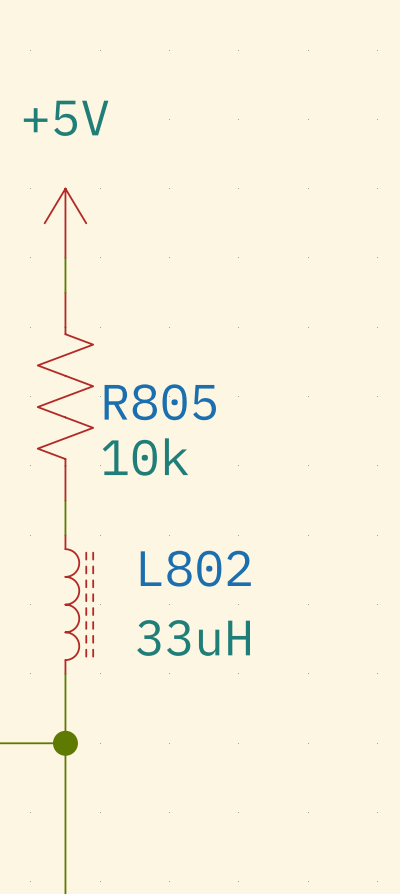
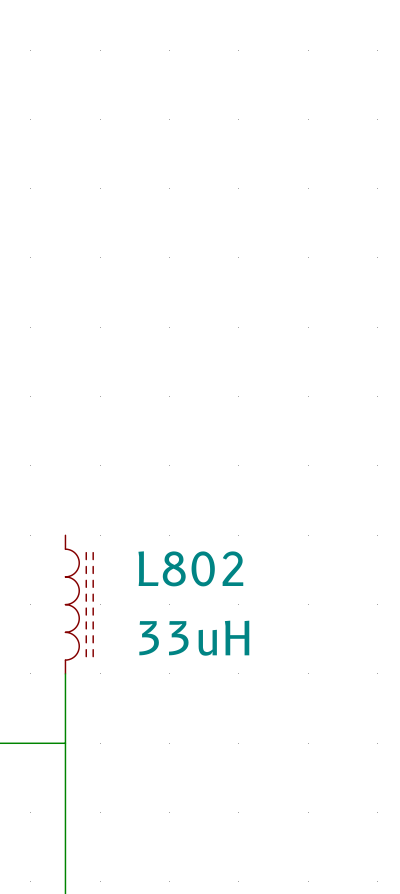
power symbol: +5V (65, 223) -> none
wire: (65, 257) (65, 292) -> none
R805: 10k (65, 396) -> none
wire: (65, 500) (65, 535) -> none
junction: (65, 743) -> none

